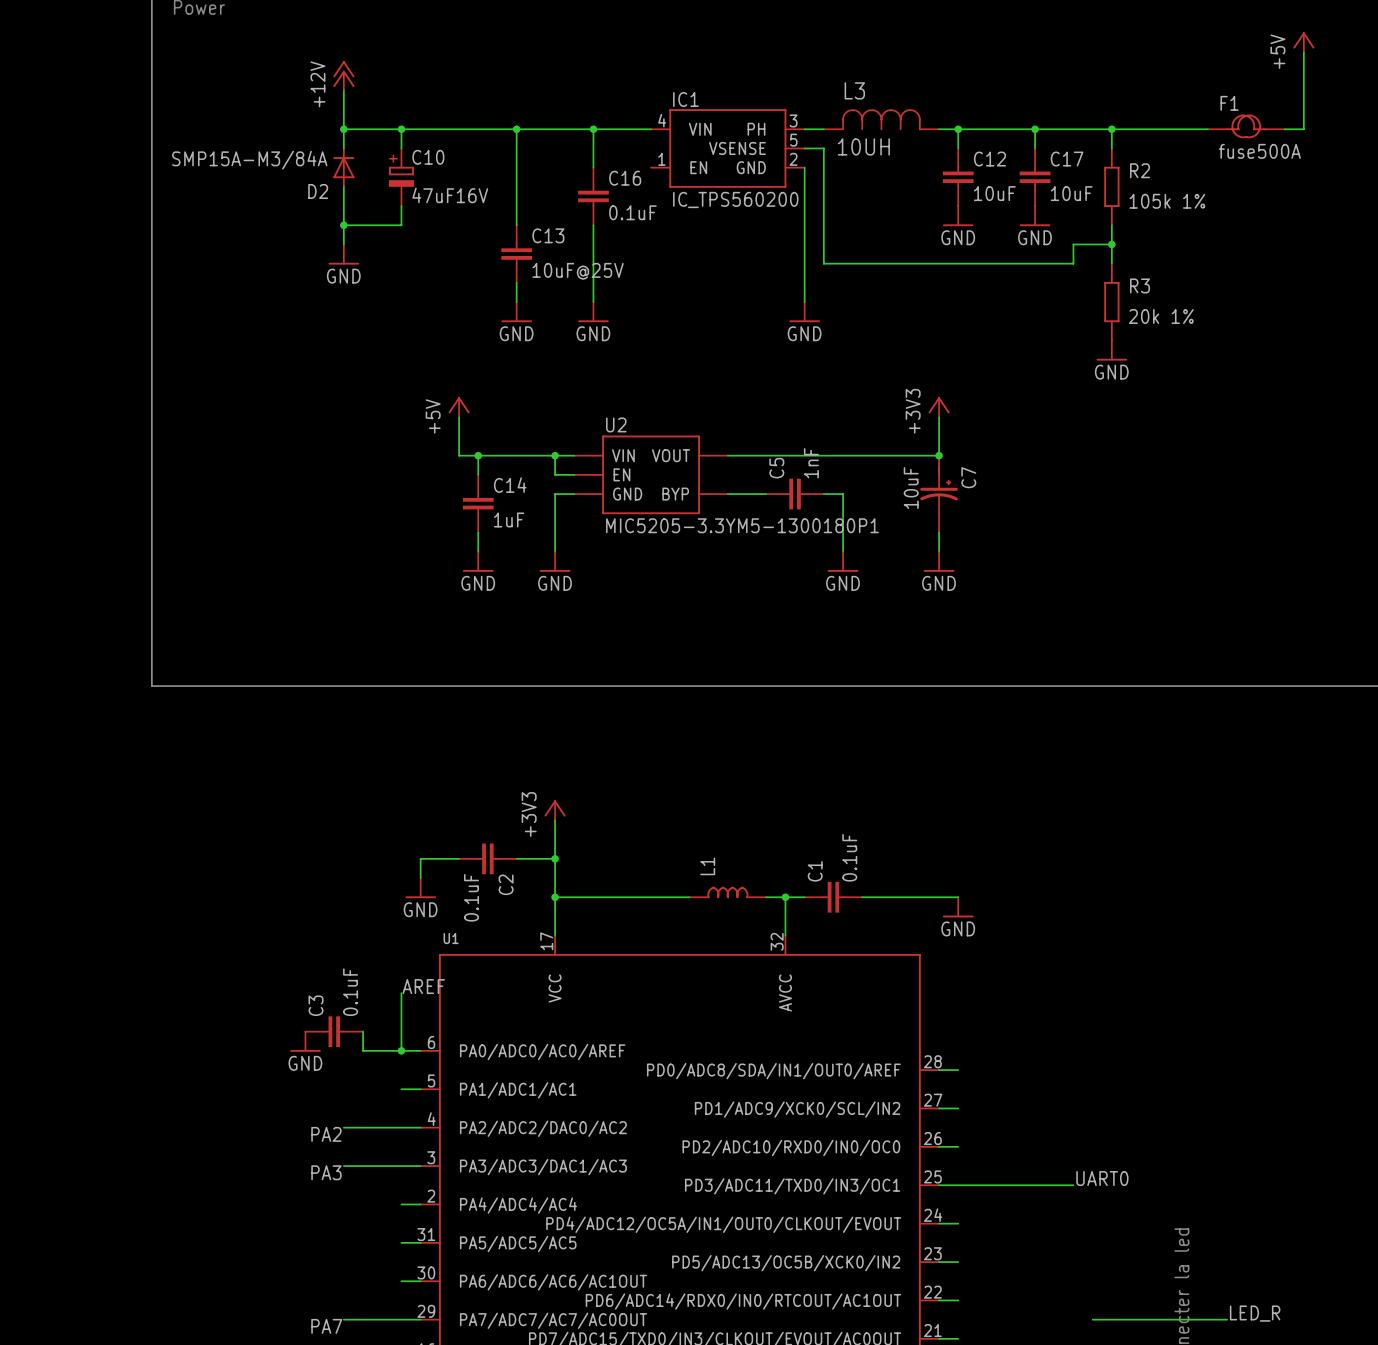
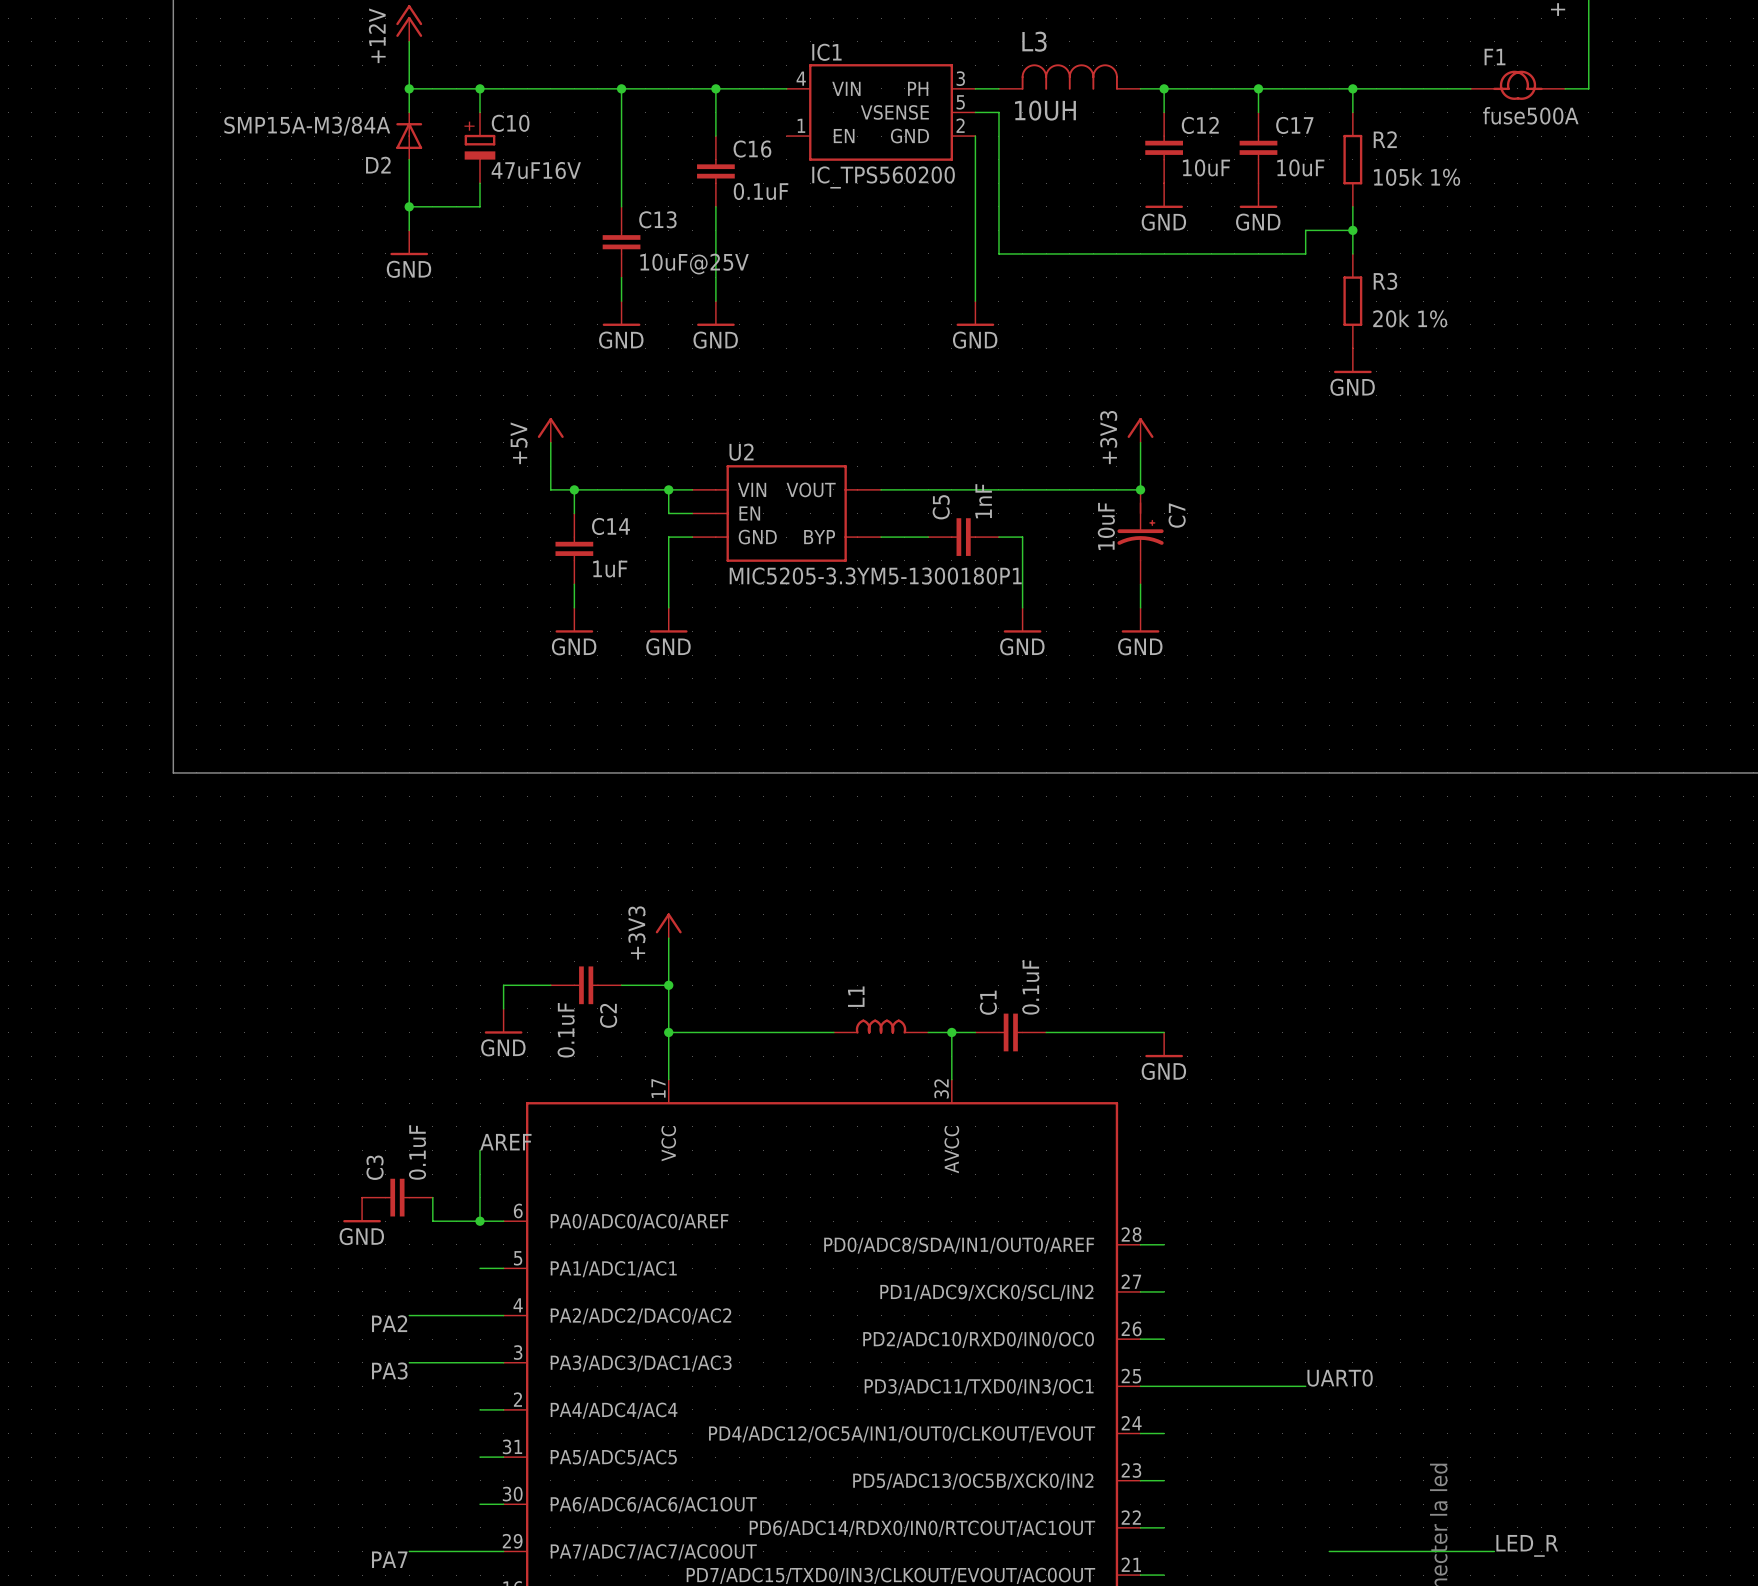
U1 name: U1 (451, 938) -> none

